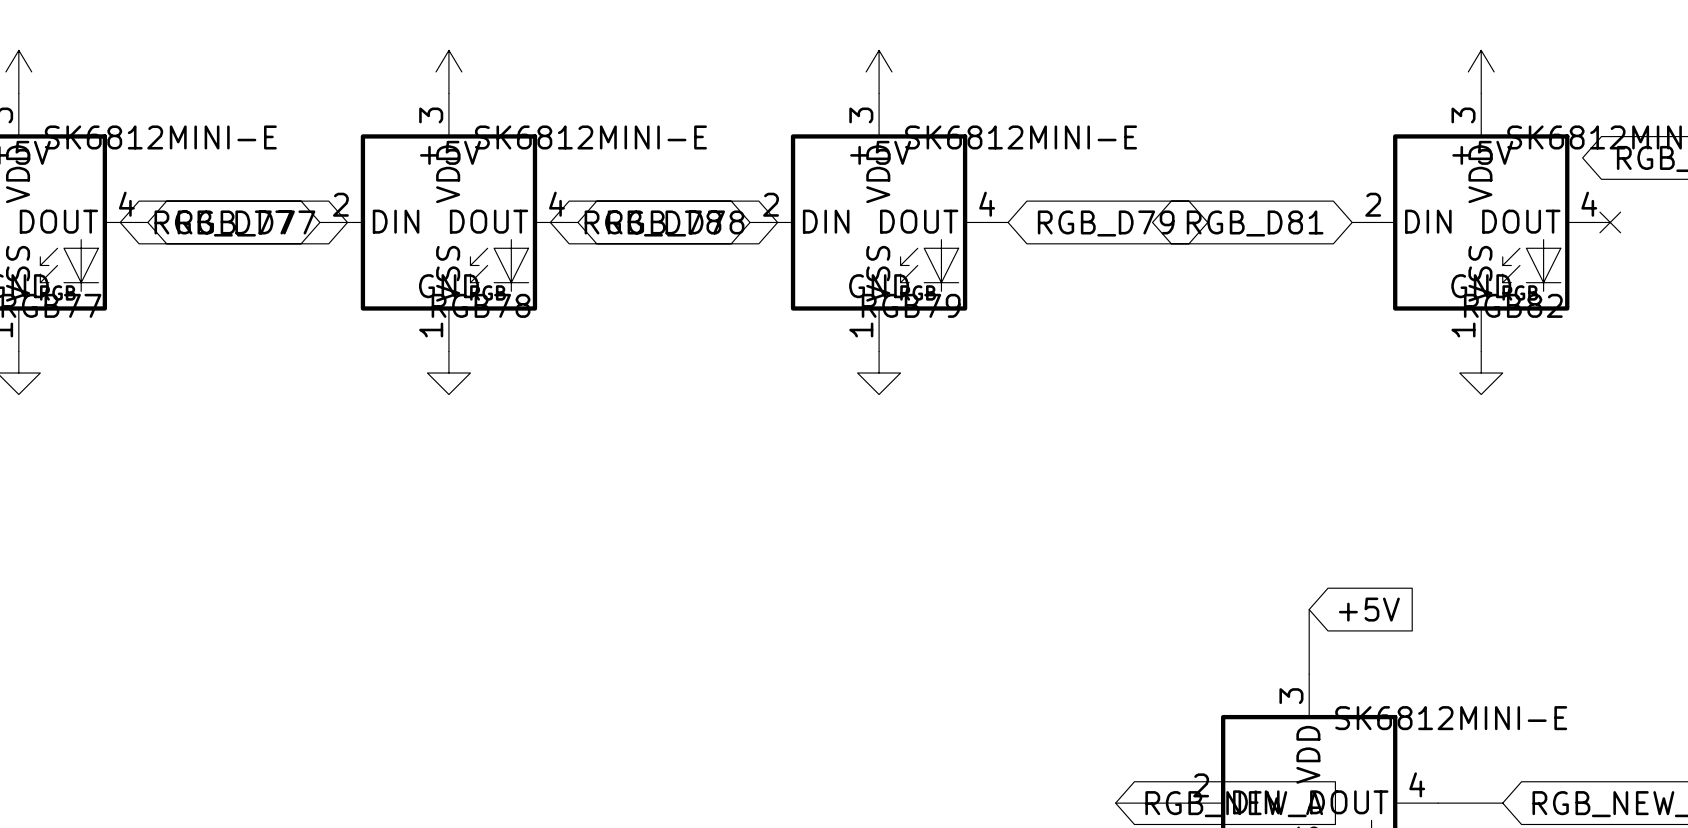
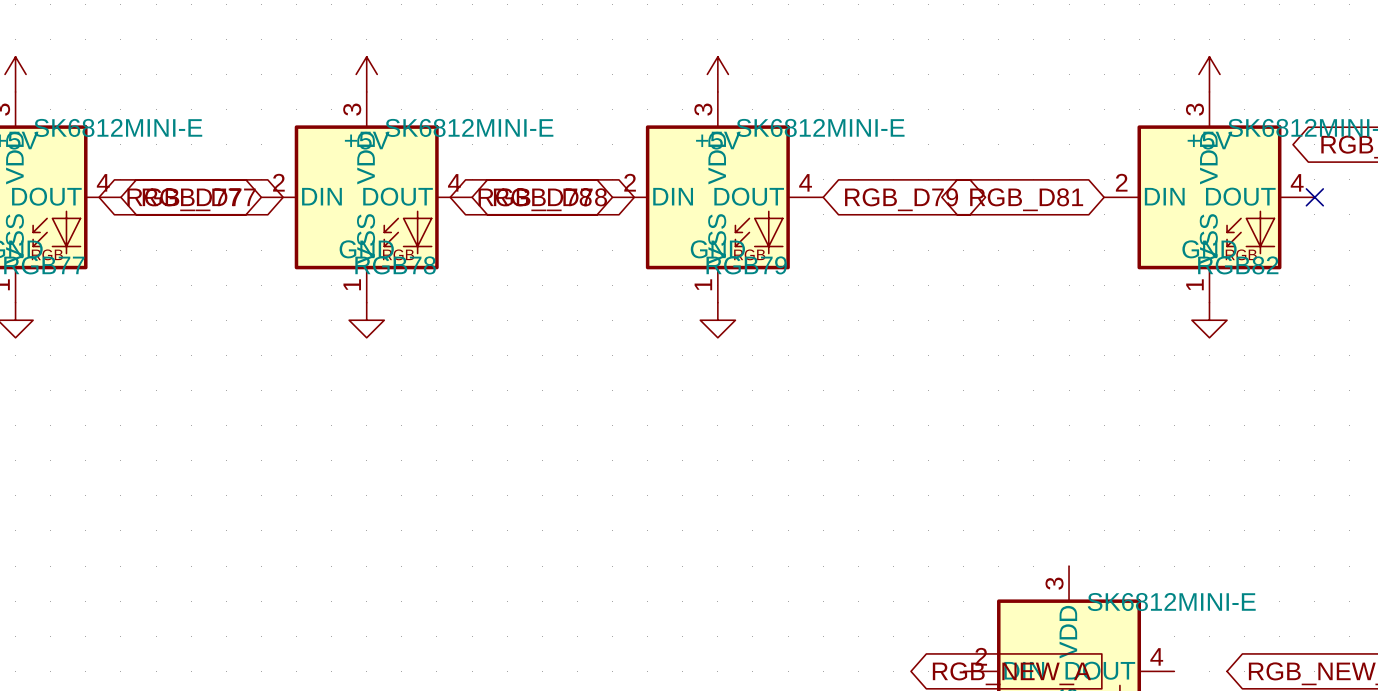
wire: (1309, 609) (1309, 674) -> none
global label: +5V (1369, 609) -> none
wire: (1115, 803) (1180, 803) -> none
wire: (1438, 803) (1502, 803) -> none

